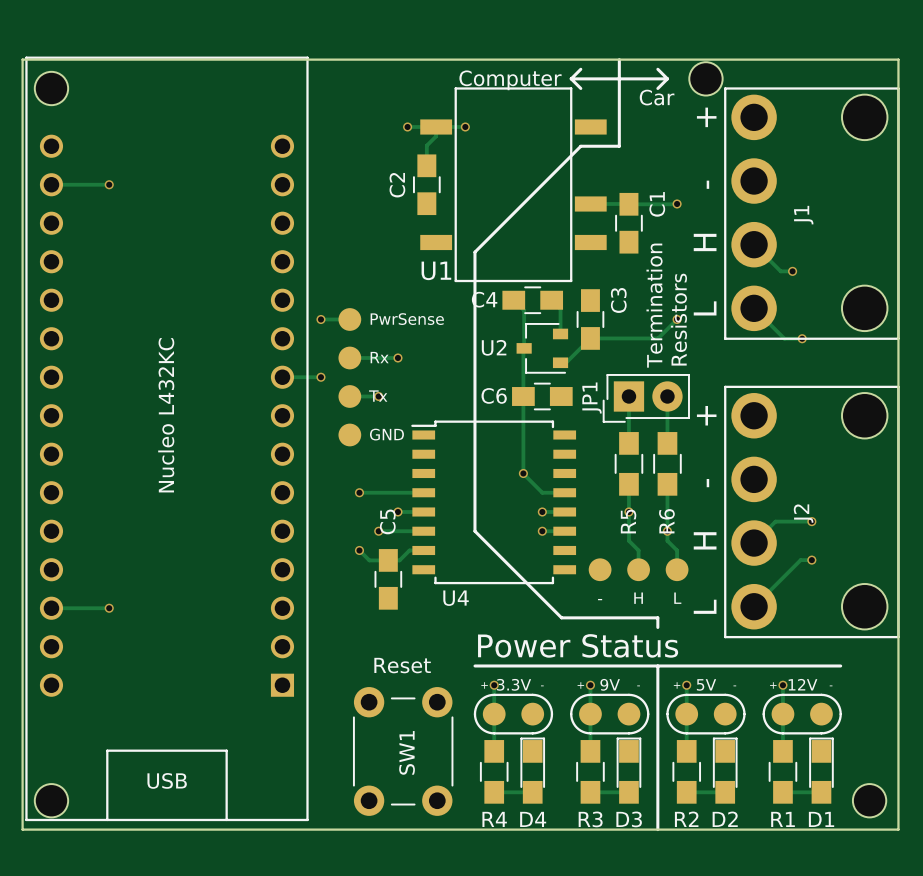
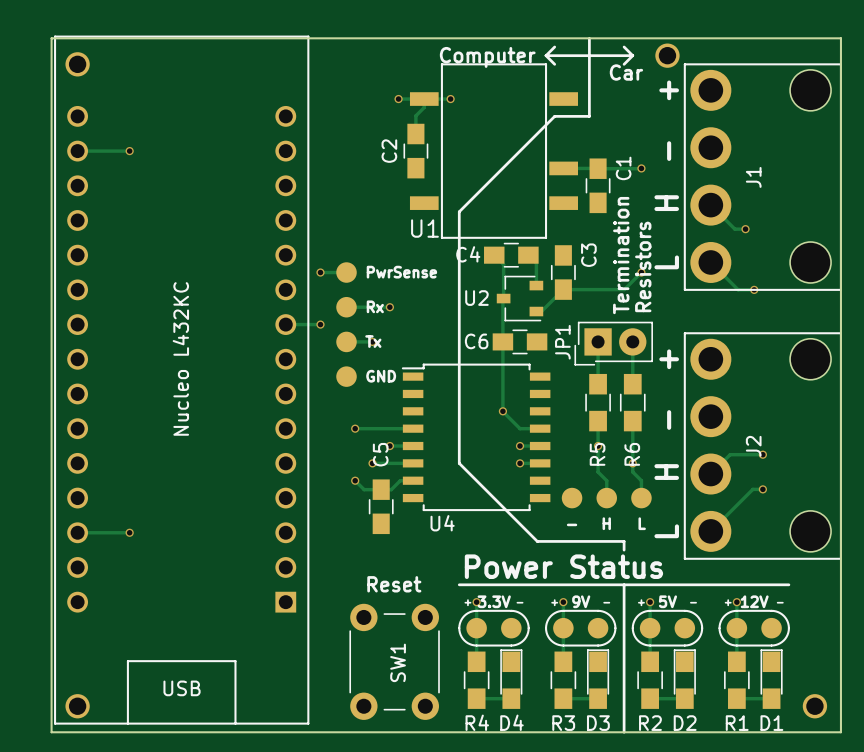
part footprint: [689, 62, 723, 96] -> [655, 43, 680, 68]
part footprint: [34, 71, 69, 106] -> [65, 52, 90, 77]
part footprint: [34, 784, 69, 818] -> [65, 694, 90, 719]
part footprint: [852, 784, 887, 818] -> [802, 694, 828, 719]

